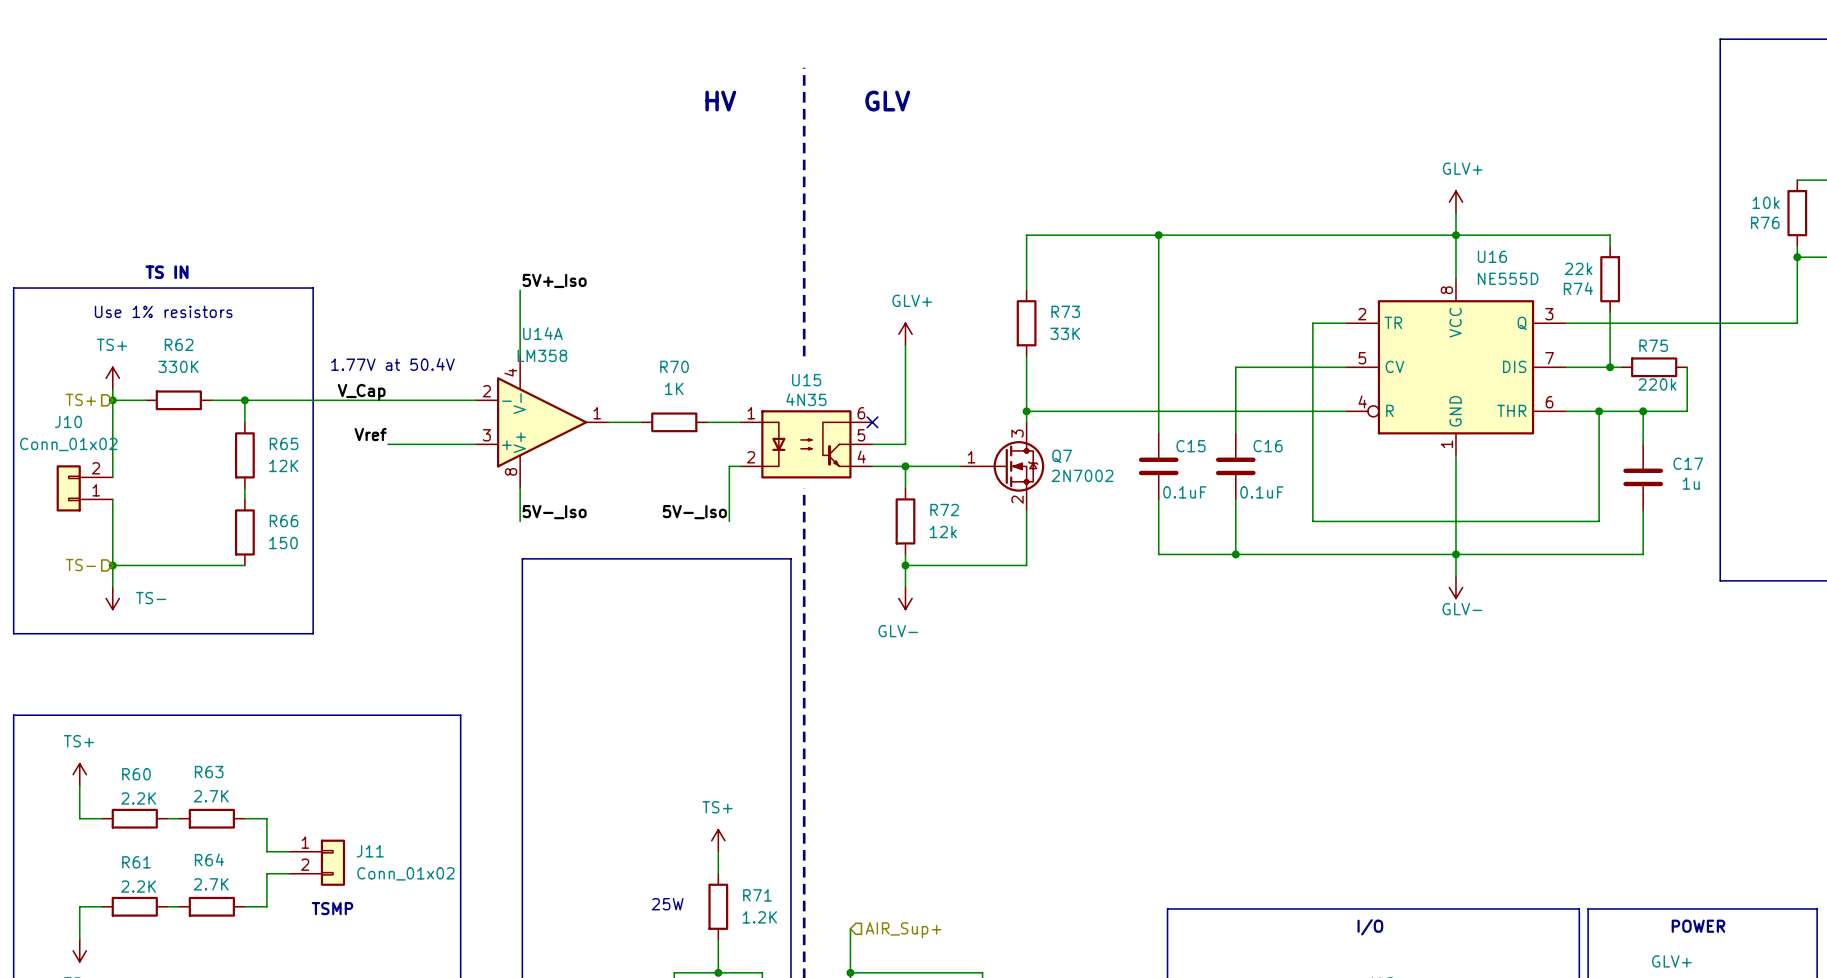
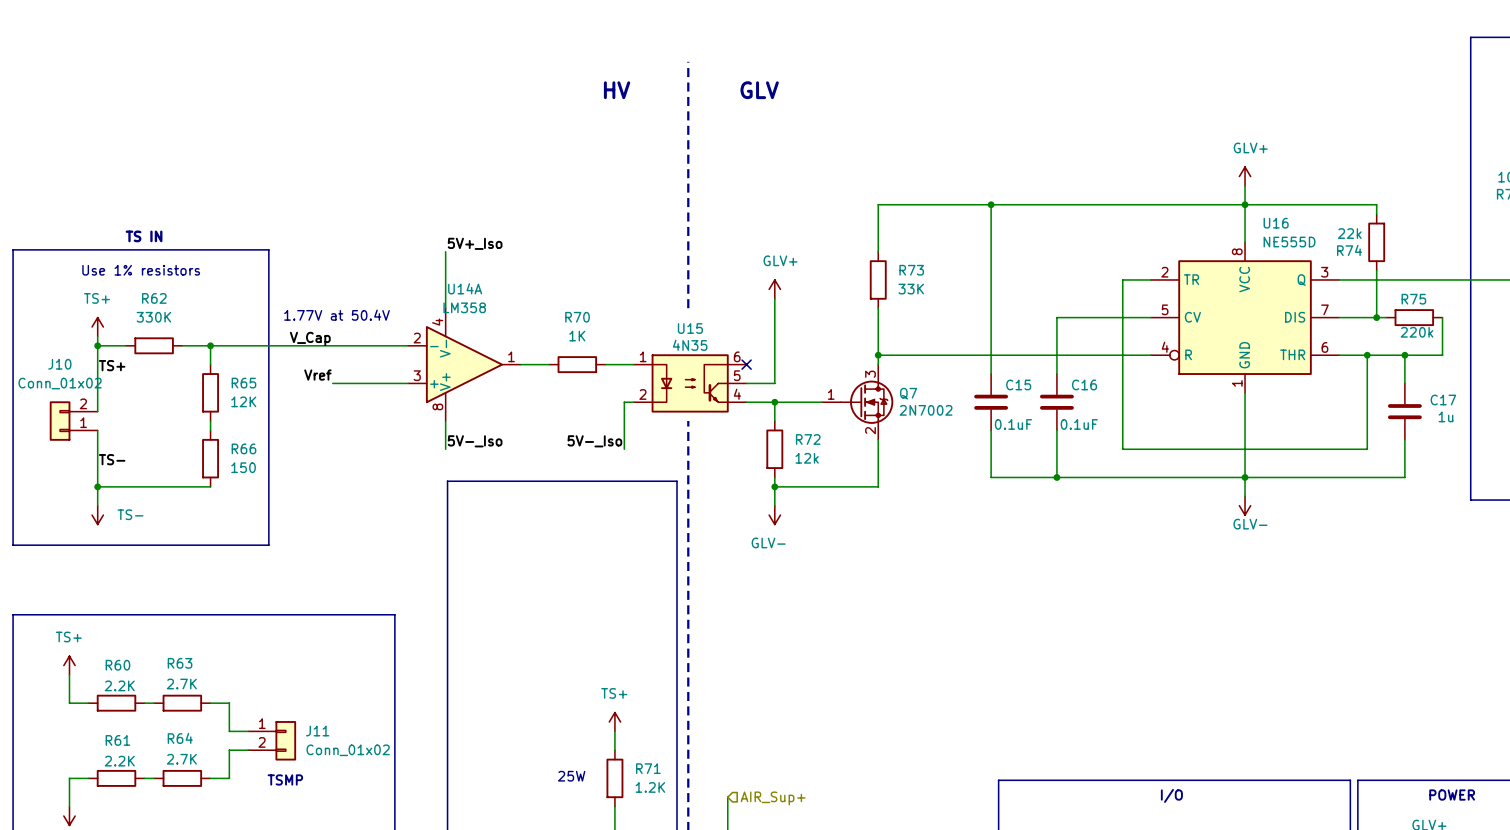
hierarchical label: TS+ (80, 399) -> none
label: none -> TS+ (112, 365)
label: none -> TS- (112, 459)
hierarchical label: TS- (80, 565) -> none

